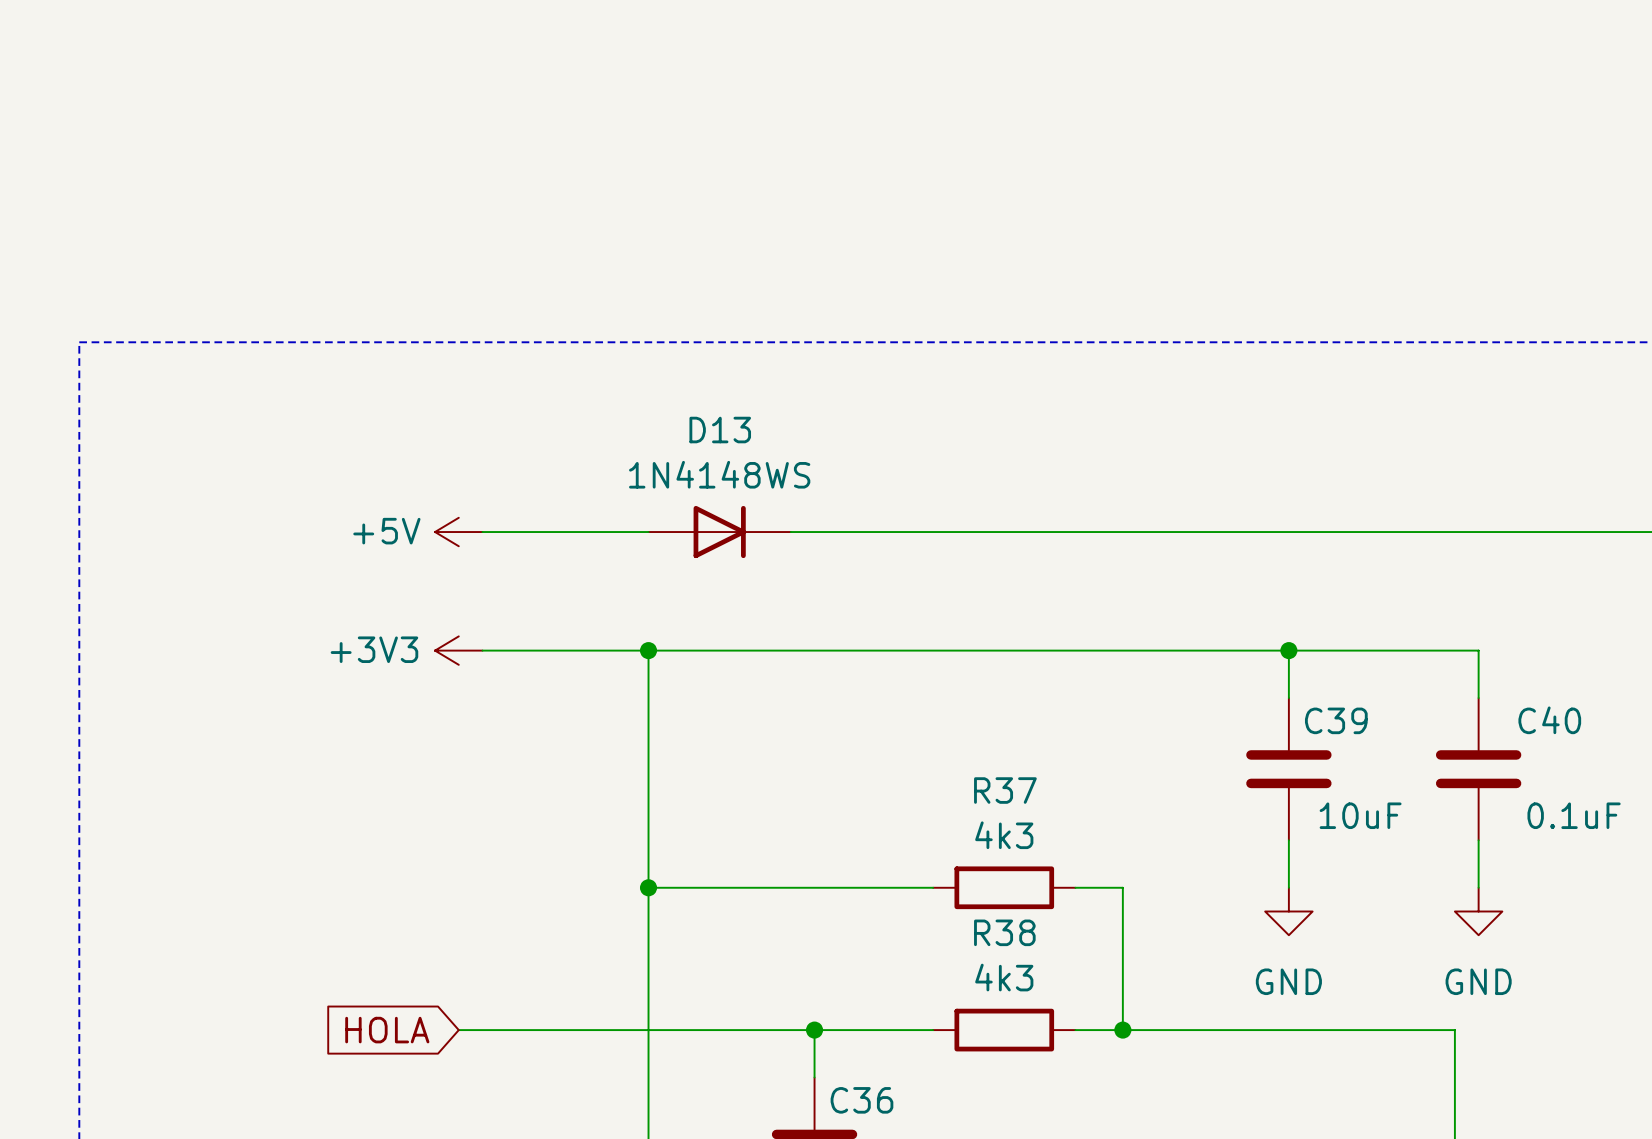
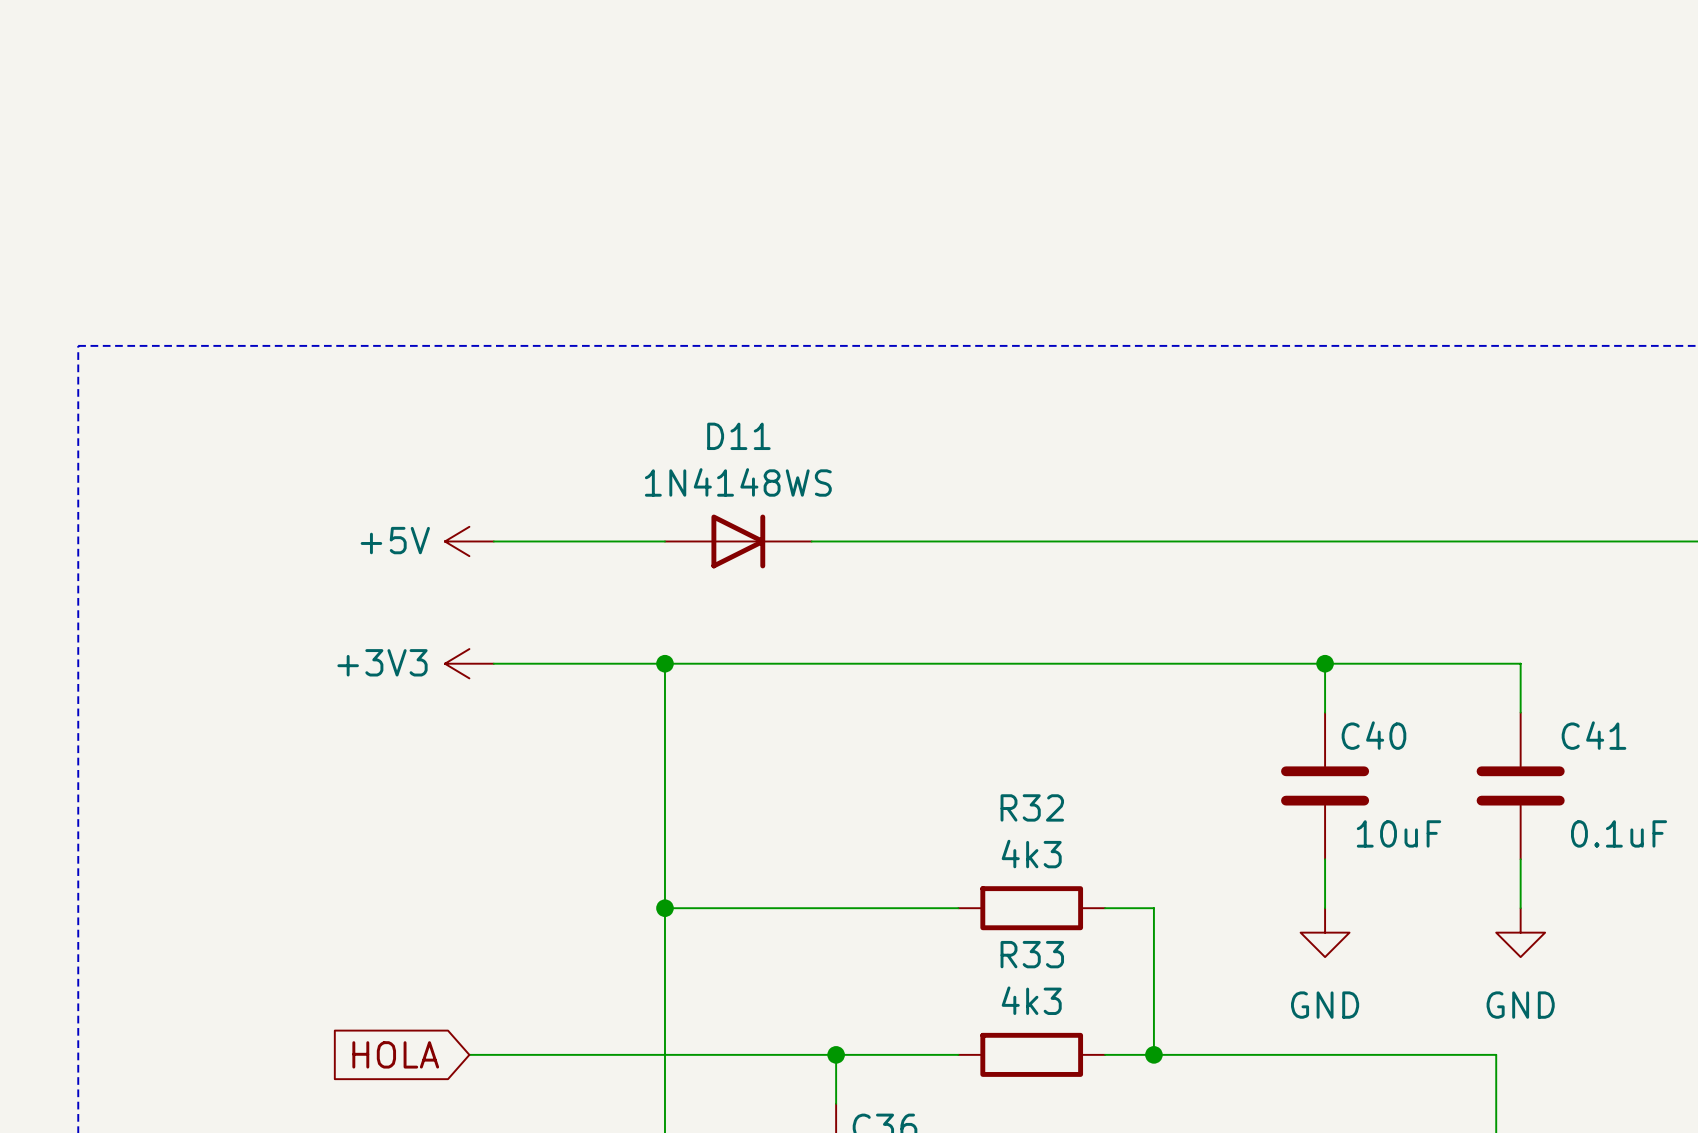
D13 name: D13 (720, 430) -> D11 (738, 436)
C39 name: C39 (1336, 720) -> C40 (1373, 735)
C40 name: C40 (1549, 720) -> C41 (1594, 735)
R37 name: R37 (1005, 790) -> R32 (1032, 807)
R38 name: R38 (1004, 932) -> R33 (1032, 954)

